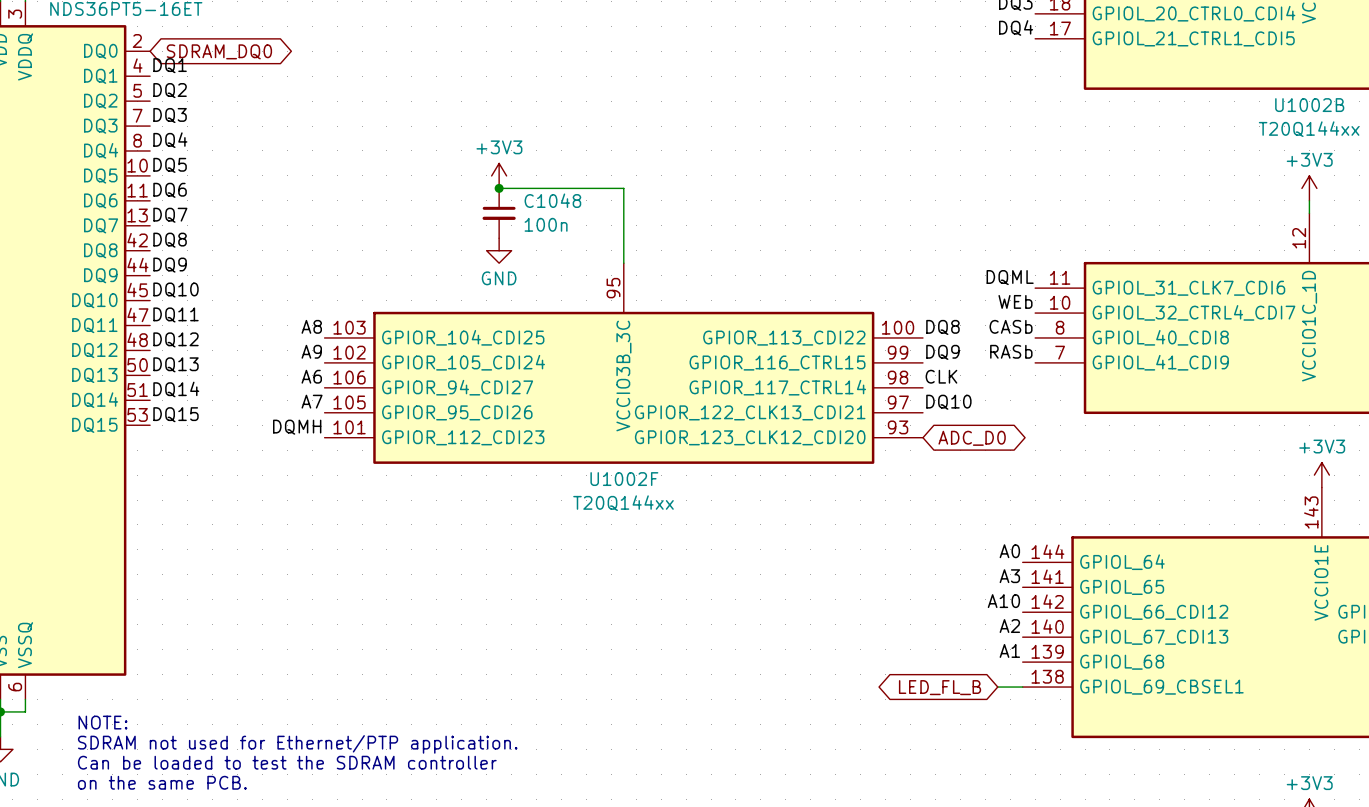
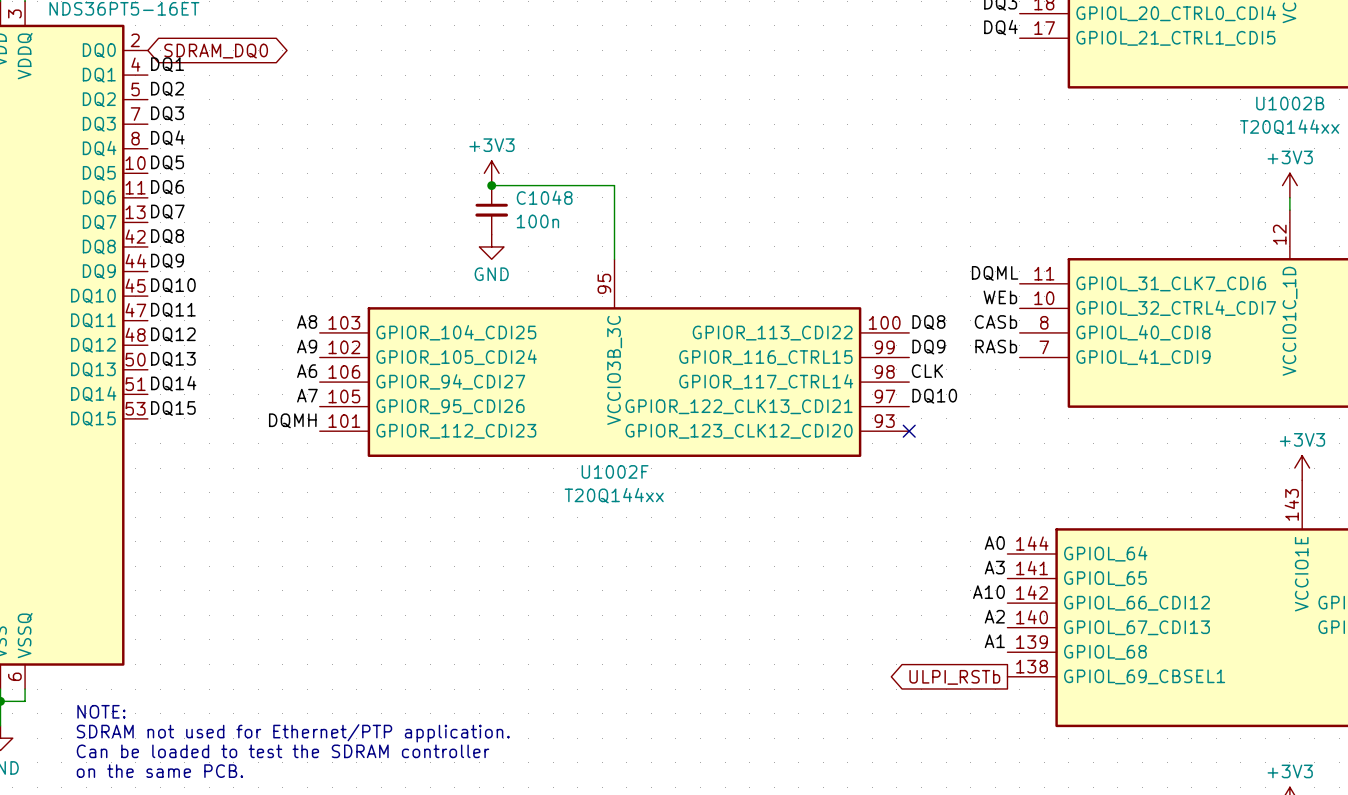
no-connect mark: none -> (909, 431)
global label: ADC_D0 (972, 438) -> none
global label: LED_FL_B (940, 687) -> none
global label: none -> ULPI_RSTb (954, 677)
wire: (997, 687) (1022, 687) -> none

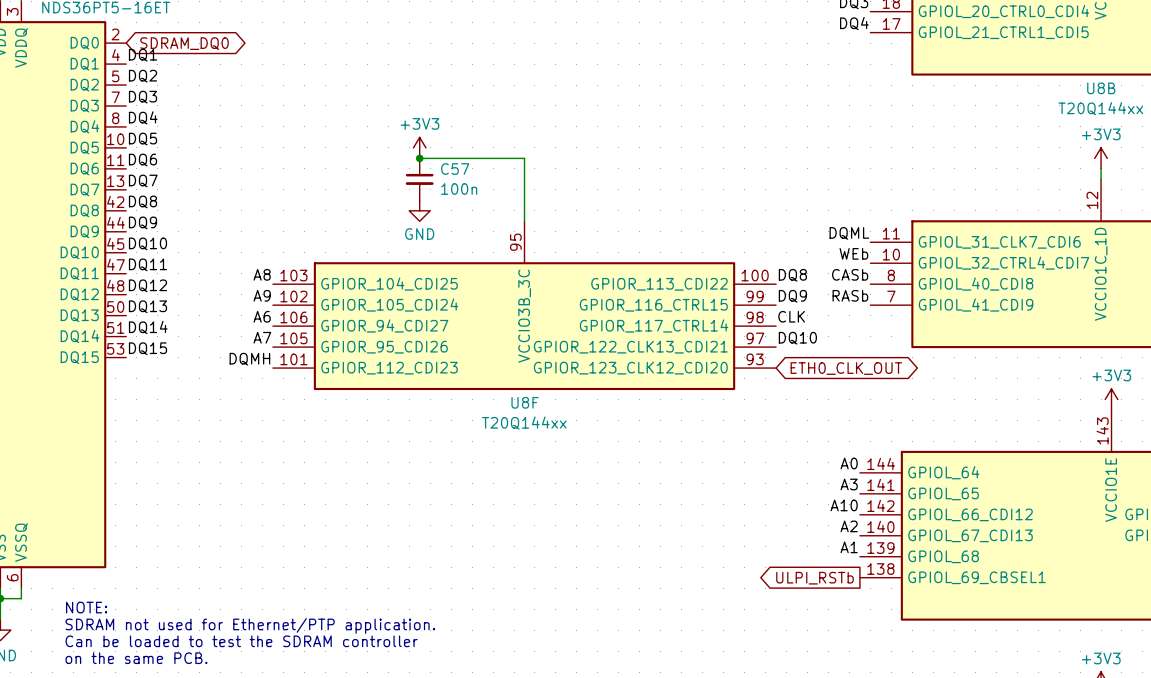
U1002B name: U1002B (1290, 103) -> U8B (1101, 88)
C1048 name: C1048 (544, 197) -> C57 (455, 169)
no-connect mark: (909, 431) -> none
global label: none -> ETH0_CLK_OUT (846, 368)
U1002F name: U1002F (615, 471) -> U8F (525, 402)

